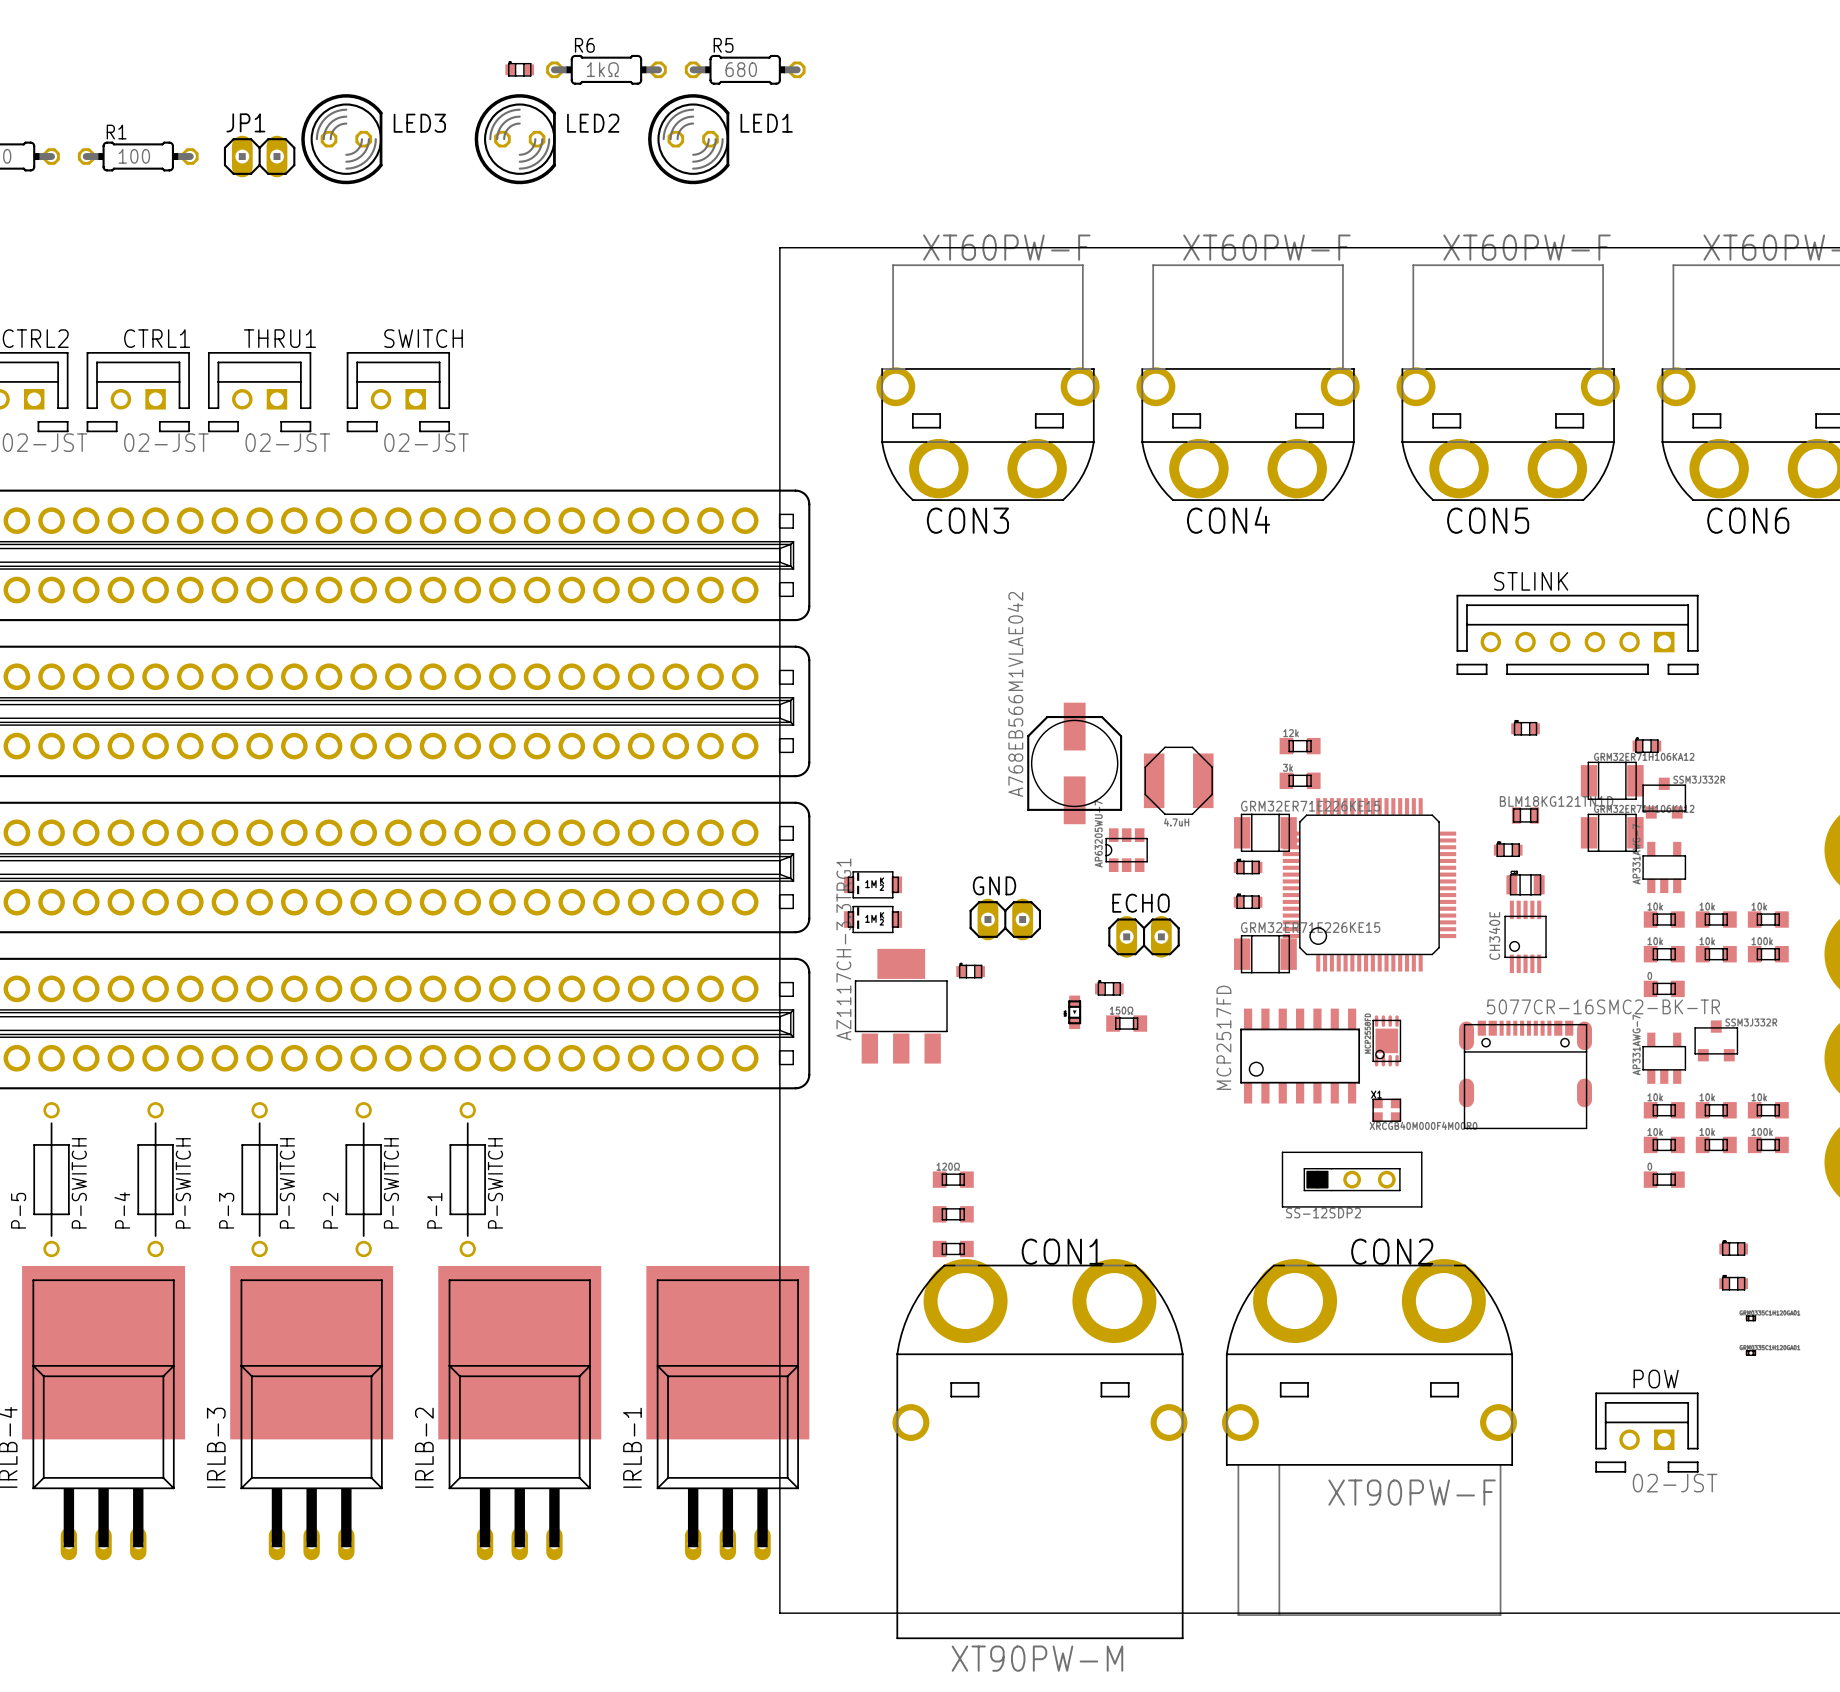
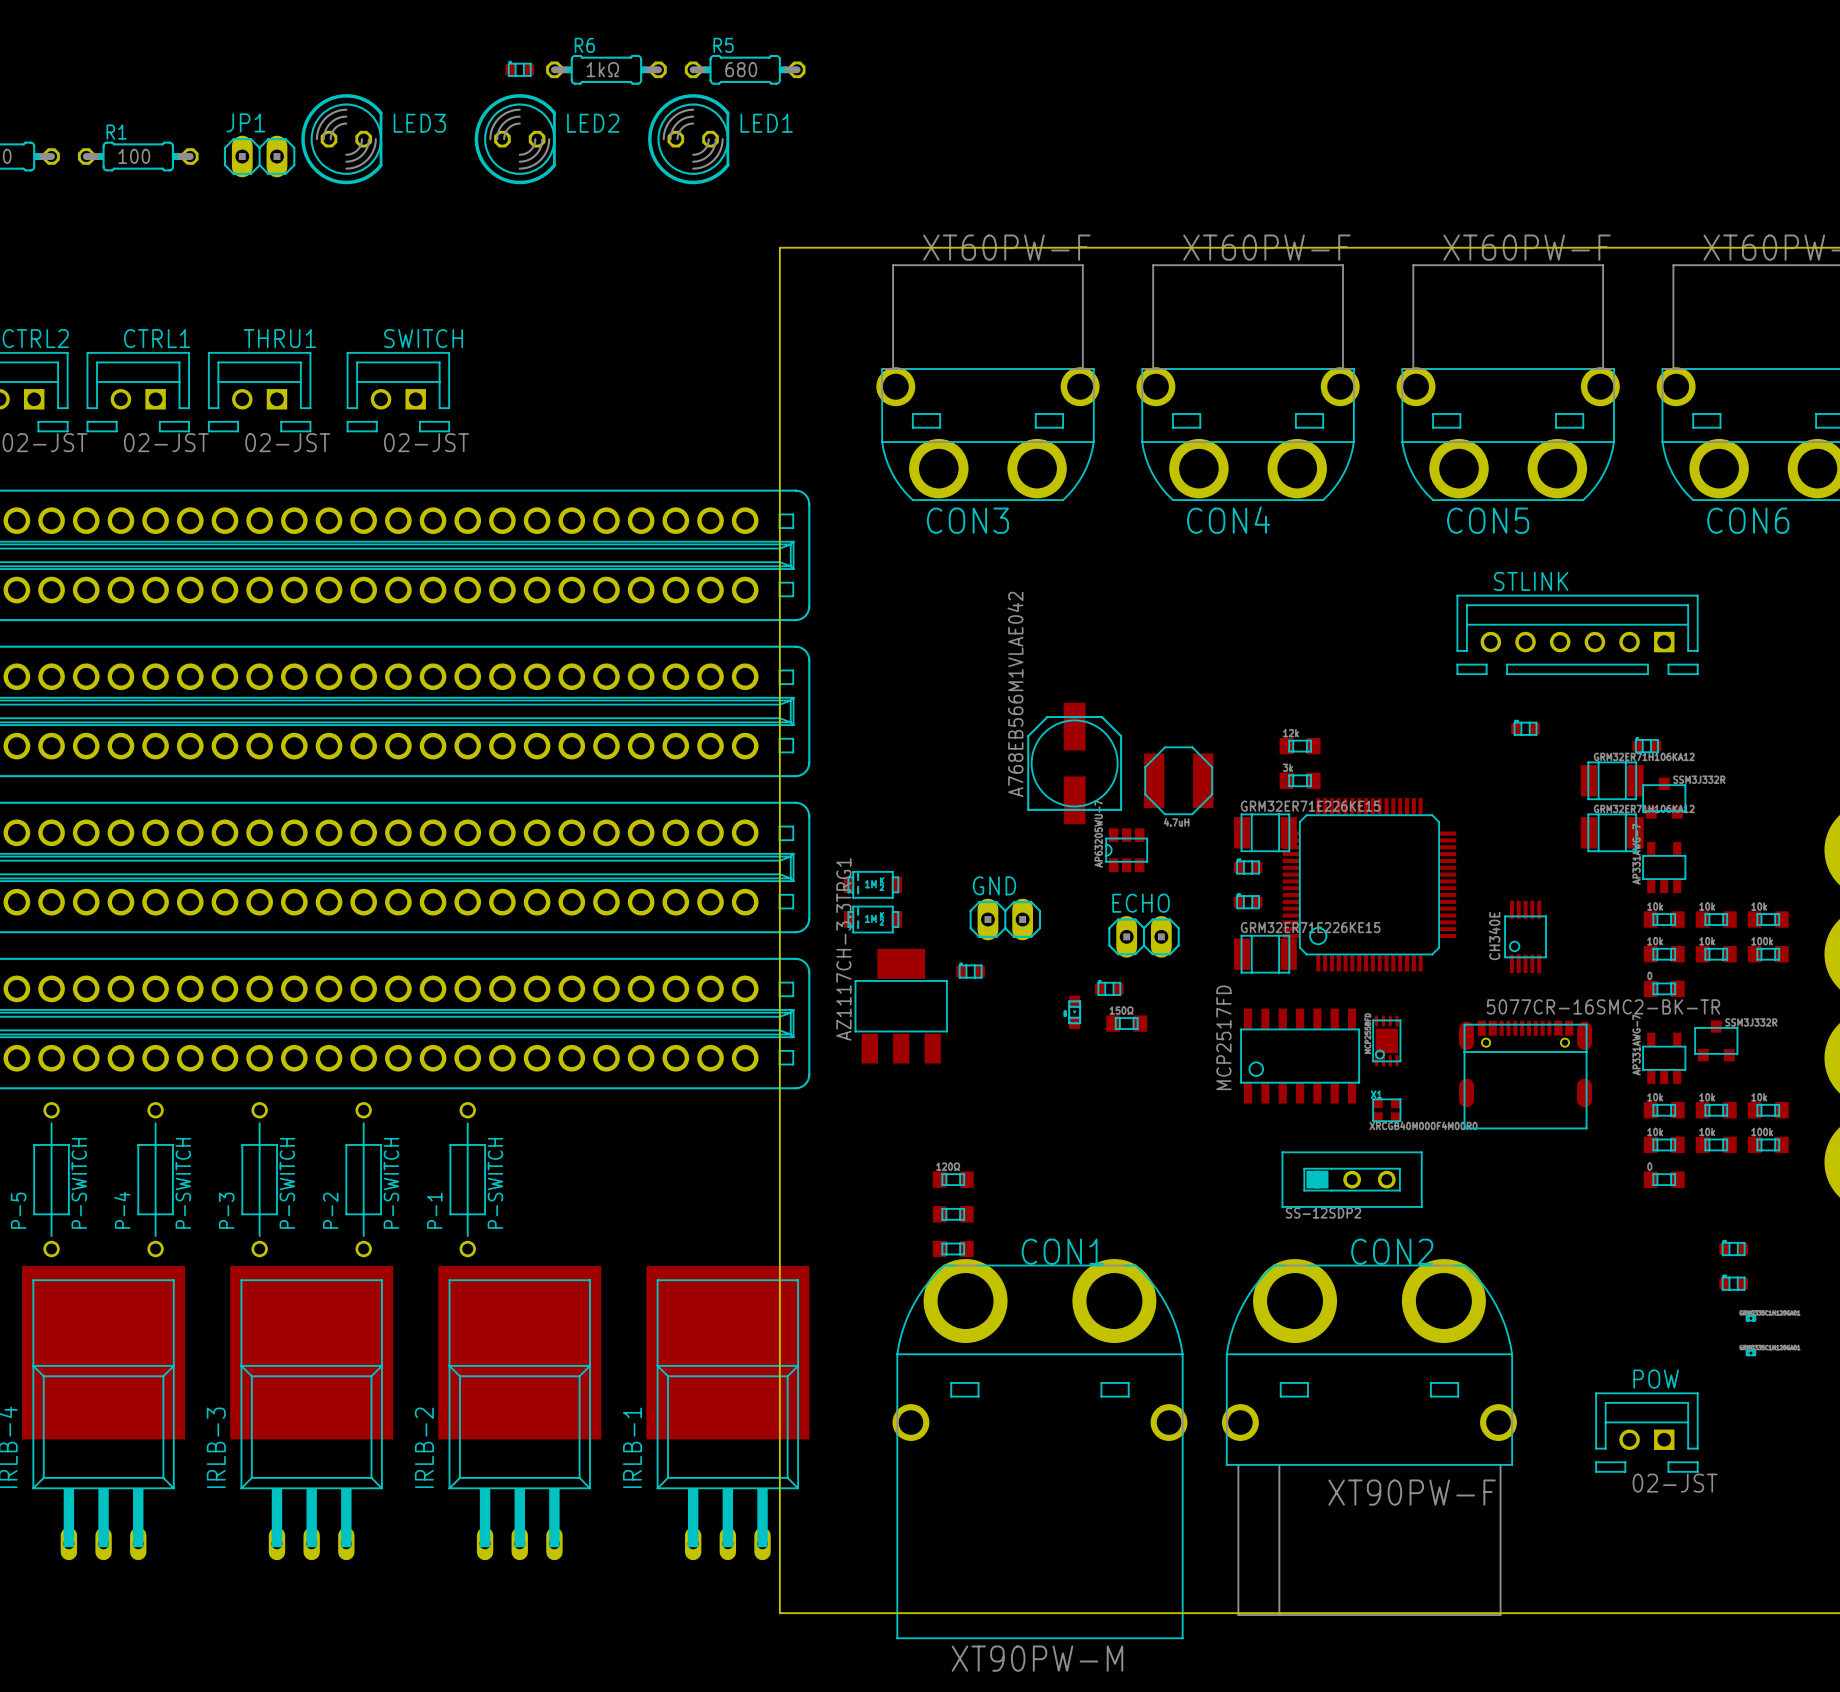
part: BLM18KG121TN1D (1525, 815) -> none
part: (1508, 850) -> none
part: (1525, 884) -> none

